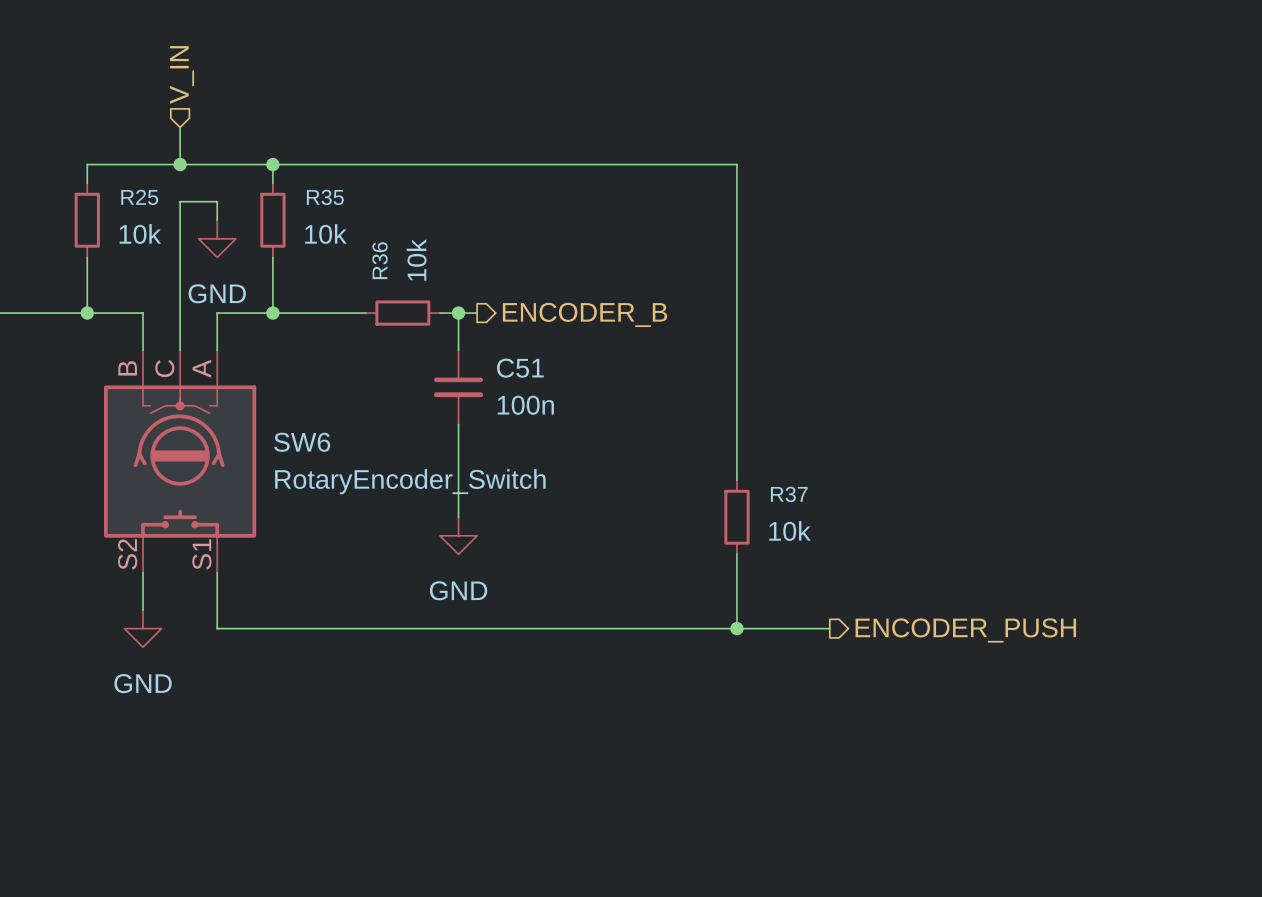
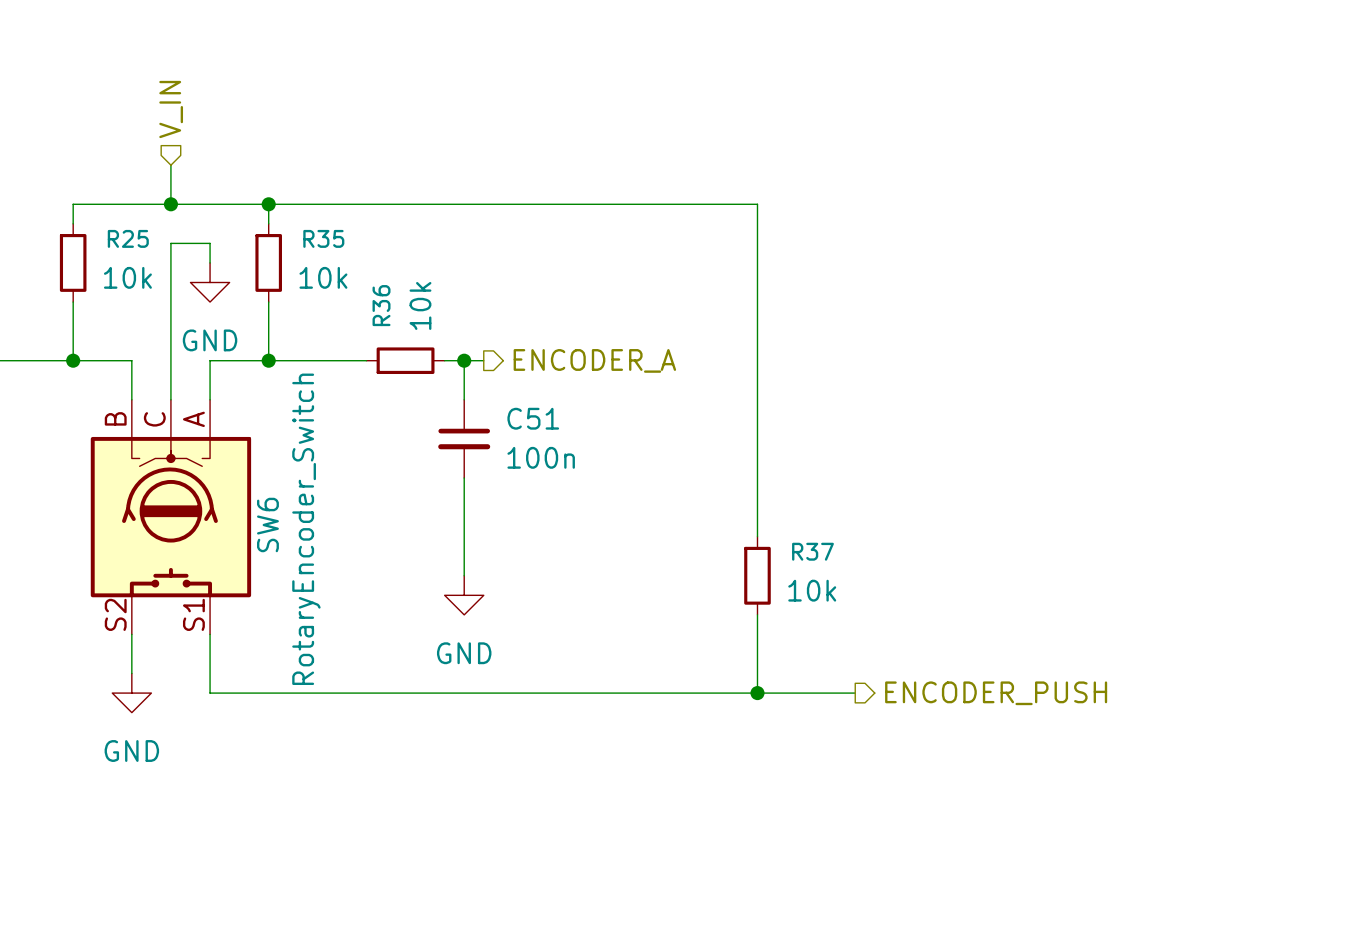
hierarchical label: ENCODER_B (585, 314) -> ENCODER_A (594, 360)
SW6 name rotation: 0° (302, 442) -> 90° counterclockwise (267, 524)
SW6 value rotation: 0° (410, 481) -> 90° counterclockwise (306, 529)

